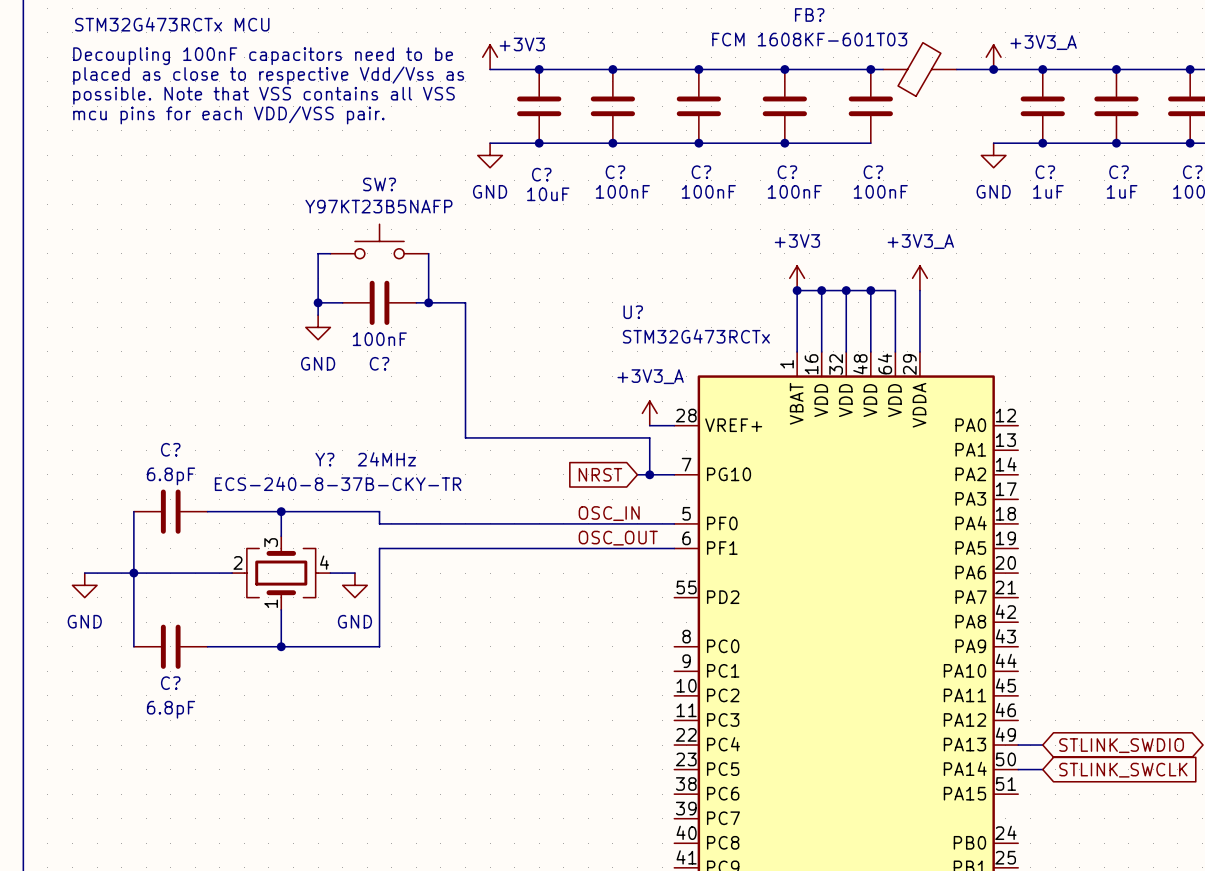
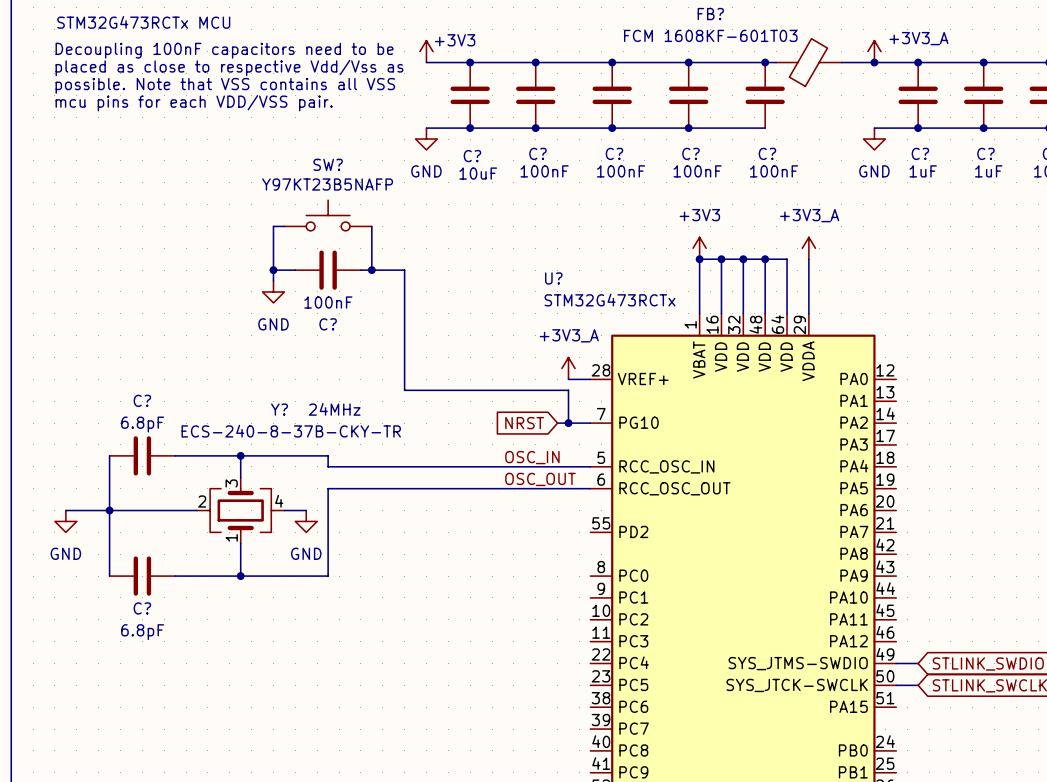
U? pin name: PF0 (722, 523) -> RCC_OSC_IN (666, 466)
U? pin name: PF1 (722, 548) -> RCC_OSC_OUT (674, 488)
U? pin name: PA13 (964, 744) -> SYS_JTMS-SWDIO (798, 663)
U? pin name: PA14 (965, 768) -> SYS_JTCK-SWCLK (797, 685)

